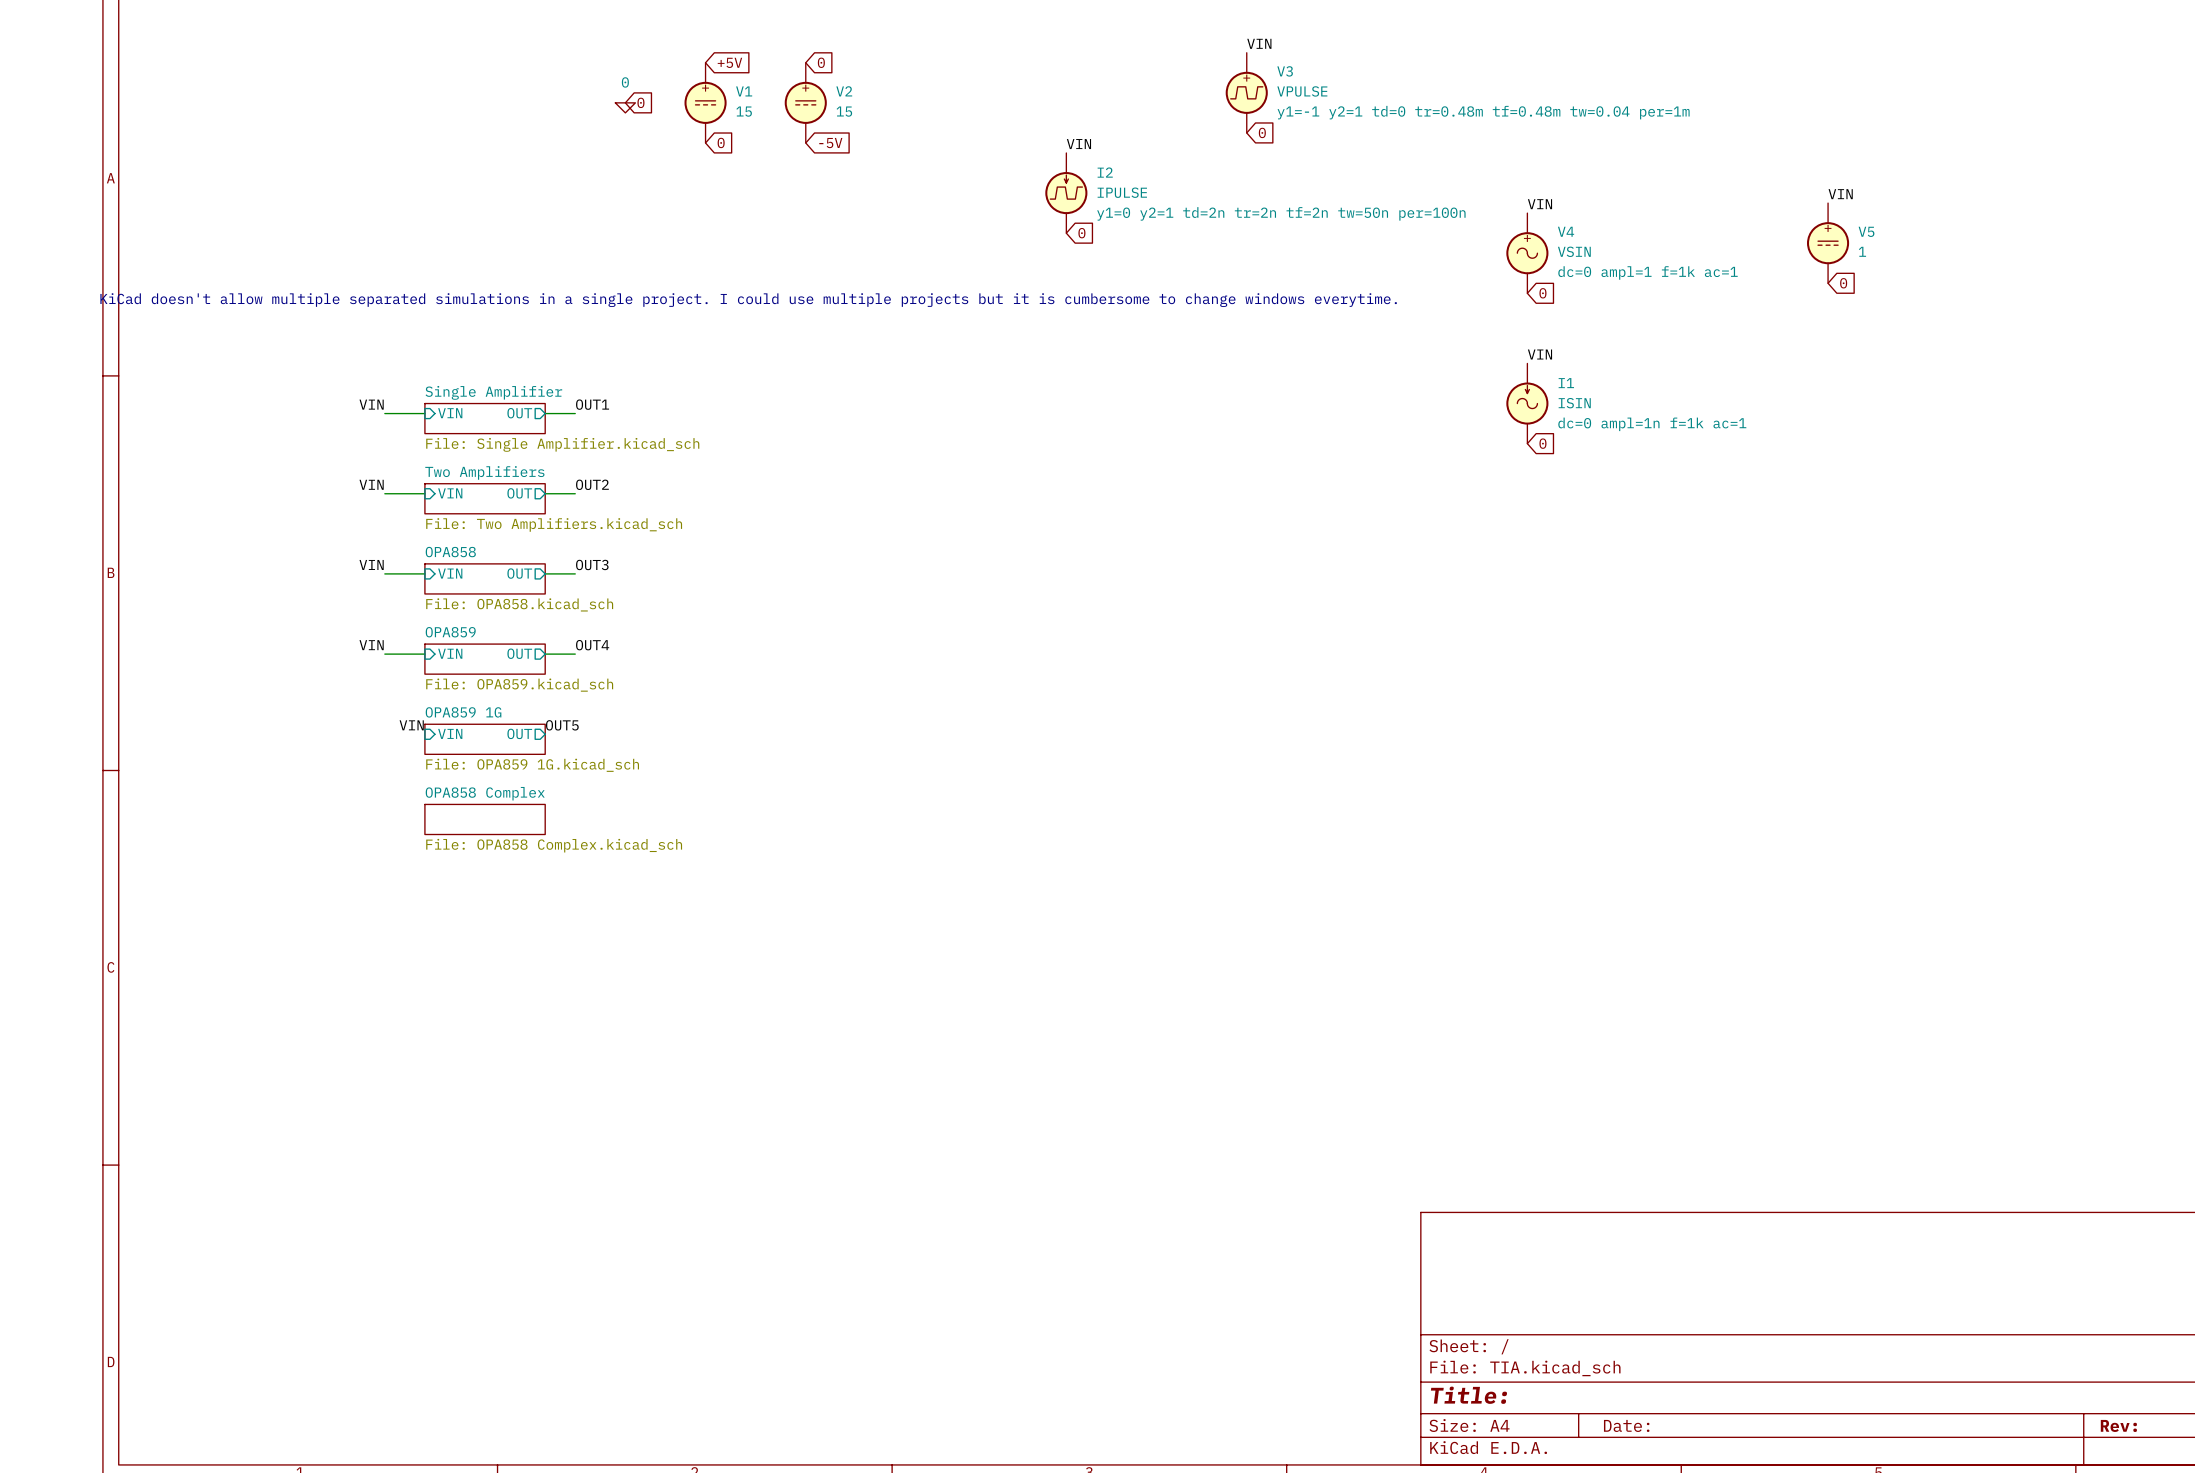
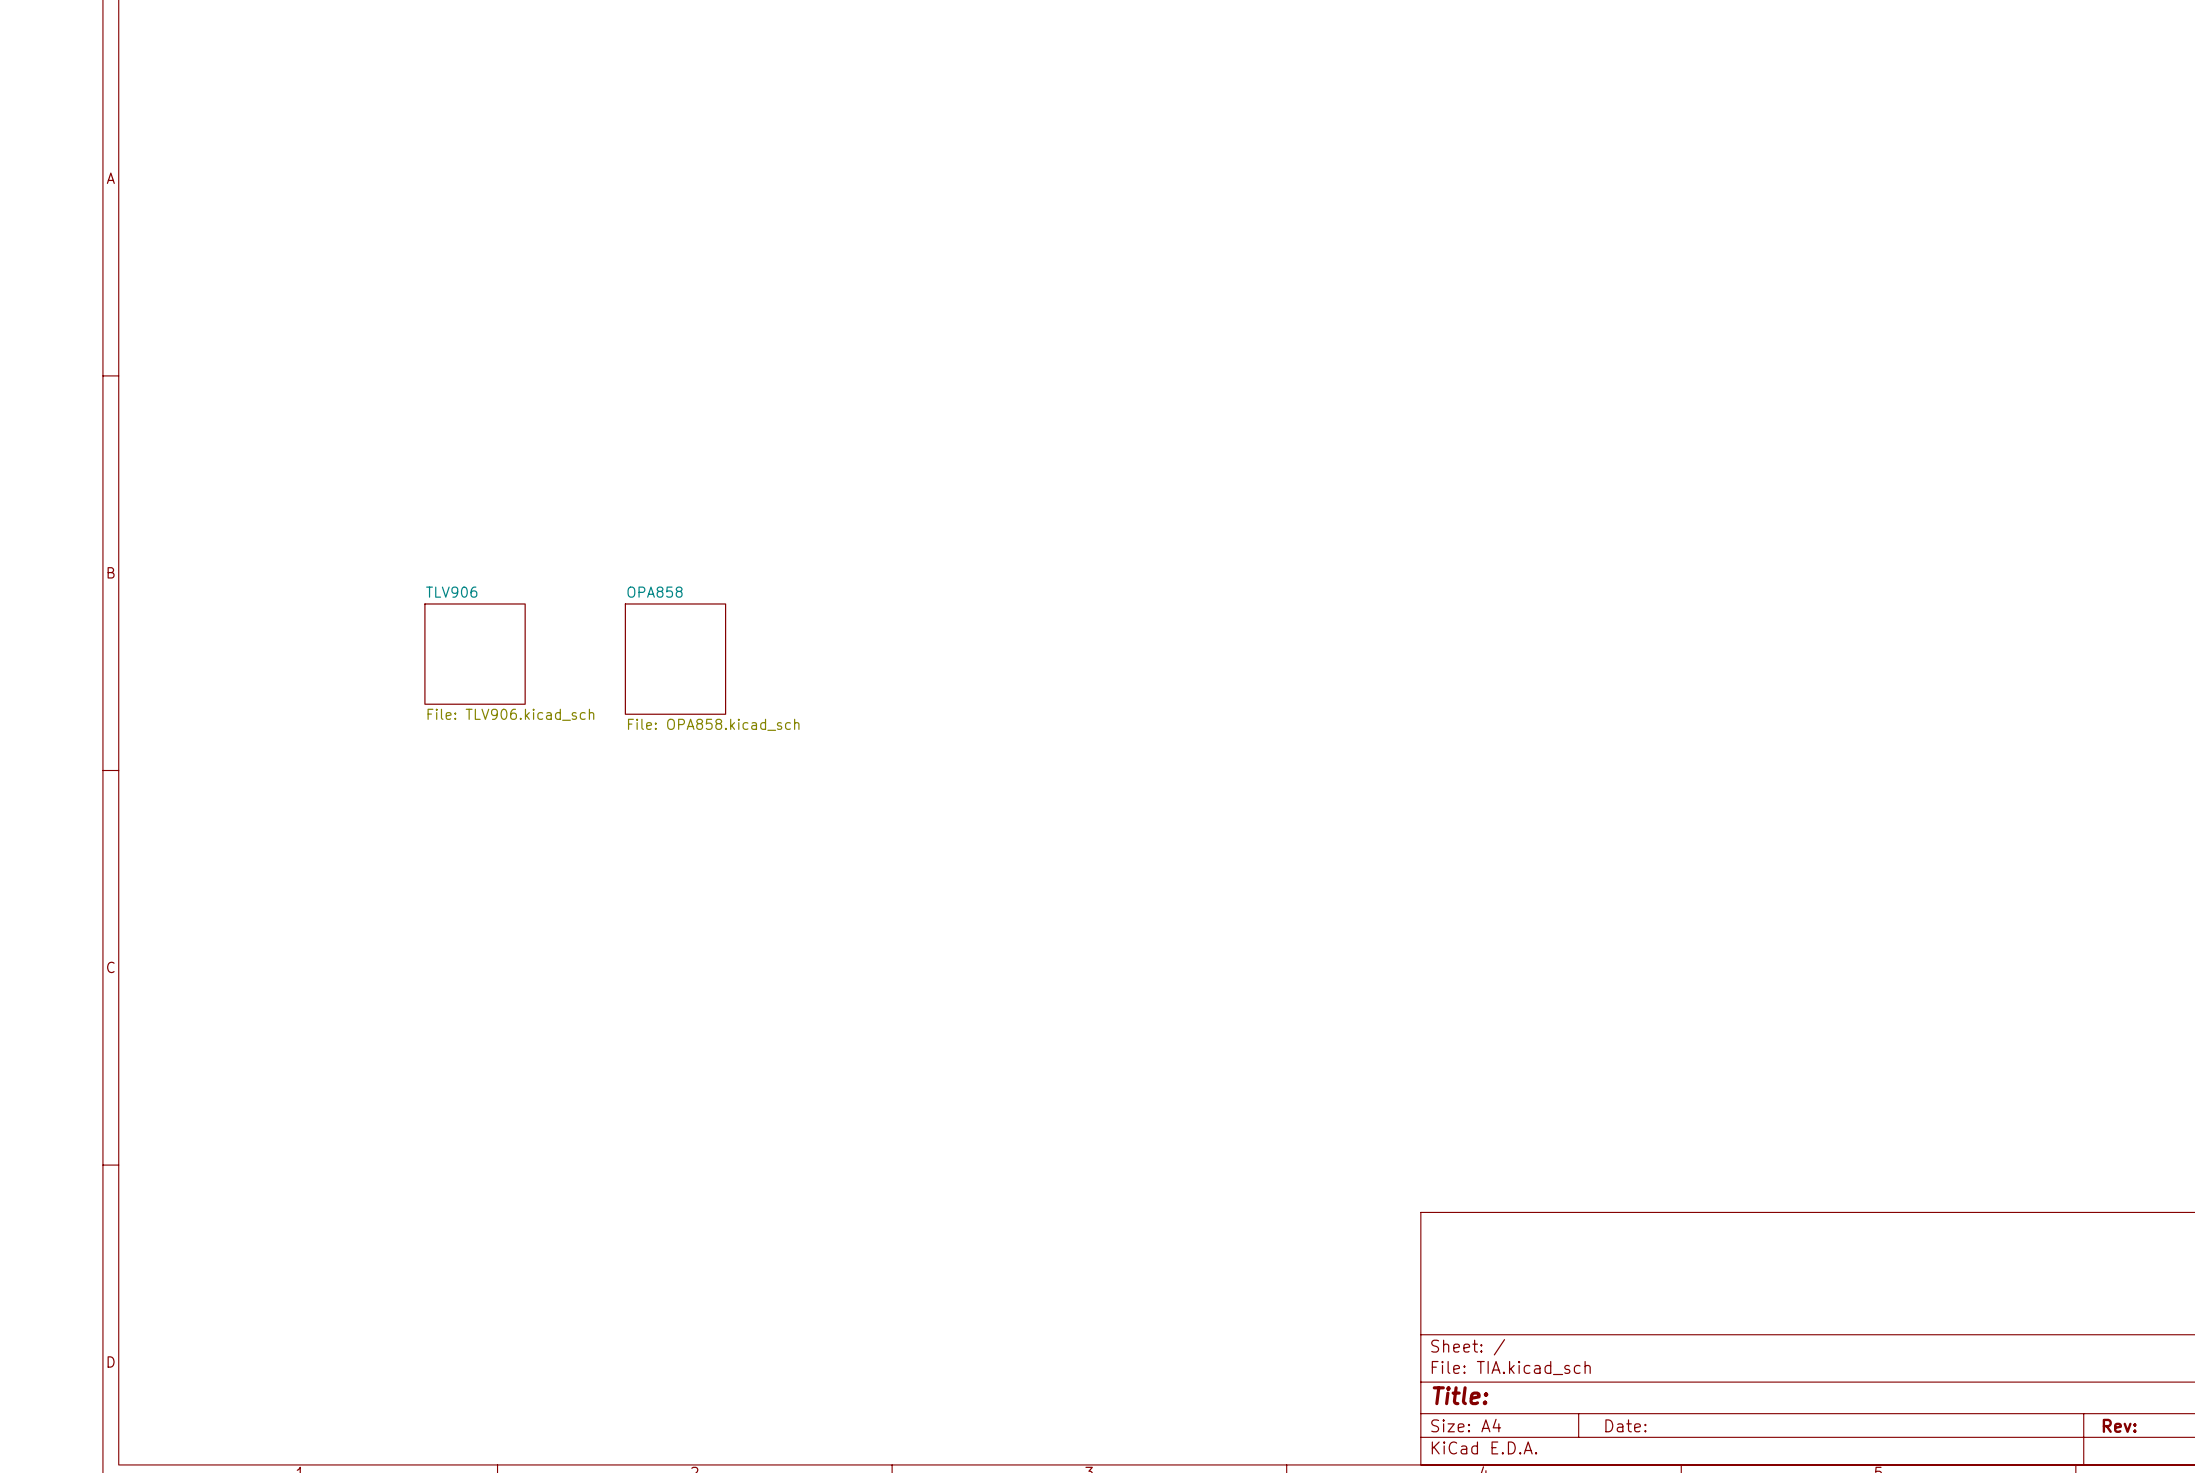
label: VIN (1259, 43) -> none
global label: +5V (729, 62) -> none
global label: 0 (821, 62) -> none
V3: VPULSE (1246, 92) -> none
global label: 0 (640, 102) -> none
V1: 15 (705, 102) -> none
V2: 15 (805, 102) -> none
power symbol: 0 (625, 107) -> none
global label: 0 (1262, 132) -> none
global label: 0 (721, 142) -> none
global label: -5V (830, 143) -> none
label: VIN (1078, 144) -> none
I2: IPULSE (1066, 193) -> none
label: VIN (1840, 194) -> none
label: VIN (1539, 204) -> none
global label: 0 (1081, 233) -> none
V5: 1 (1828, 243) -> none
V4: VSIN (1527, 253) -> none
global label: 0 (1843, 283) -> none
global label: 0 (1542, 293) -> none
text: KiCad doesn't allow multiple separated simulations in a single project. I could use multiple projects but it is cumbersome to change windows everytime. (748, 300) -> none
label: VIN (1539, 354) -> none
I1: ISIN (1527, 403) -> none
label: VIN (371, 404) -> none
label: OUT1 (592, 404) -> none
wire: (384, 413) (424, 413) -> none
sheet pin: VIN (450, 413) -> none
sheet pin: OUT (519, 413) -> none
wire: (545, 413) (575, 413) -> none
sheet Single Amplifier: File: Single Amplifier.kicad_sch (485, 418) -> none
global label: 0 (1542, 443) -> none
label: VIN (371, 484) -> none
label: OUT2 (592, 484) -> none
wire: (384, 493) (424, 493) -> none
sheet pin: VIN (450, 493) -> none
sheet pin: OUT (519, 493) -> none
wire: (545, 493) (575, 493) -> none
sheet Two Amplifiers: File: Two Amplifiers.kicad_sch (485, 498) -> none
sheet OPA858 name position: OPA858 (450, 552) -> OPA858 (655, 592)
sheet OPA858 shape: [424, 563, 546, 595] -> [624, 603, 727, 715]
label: VIN (371, 564) -> none
label: OUT3 (592, 564) -> none
wire: (384, 573) (424, 573) -> none
sheet pin: VIN (450, 573) -> none
sheet pin: OUT (519, 573) -> none
wire: (545, 573) (575, 573) -> none
sheet OPA858 value position: File: OPA858.kicad_sch (519, 604) -> File: OPA858.kicad_sch (713, 724)
label: VIN (371, 645) -> none
label: OUT4 (592, 645) -> none
sheet pin: VIN (450, 653) -> none
sheet pin: OUT (519, 653) -> none
wire: (384, 654) (424, 654) -> none
sheet TLV906: none -> File: TLV906.kicad_sch (475, 654)
wire: (545, 654) (575, 654) -> none
sheet OPA859: File: OPA859.kicad_sch (485, 659) -> none
label: VIN (411, 725) -> none
label: OUT5 (562, 725) -> none
sheet pin: VIN (450, 733) -> none
sheet pin: OUT (519, 733) -> none
sheet OPA859 1G: File: OPA859 1G.kicad_sch (485, 739) -> none
sheet OPA858 Complex: File: OPA858 Complex.kicad_sch (485, 819) -> none

